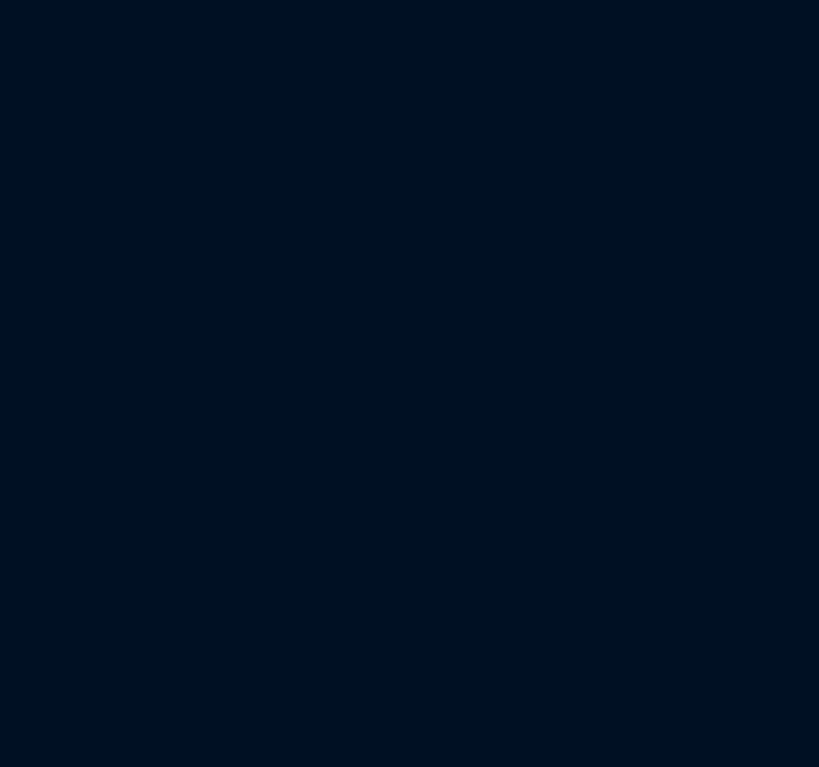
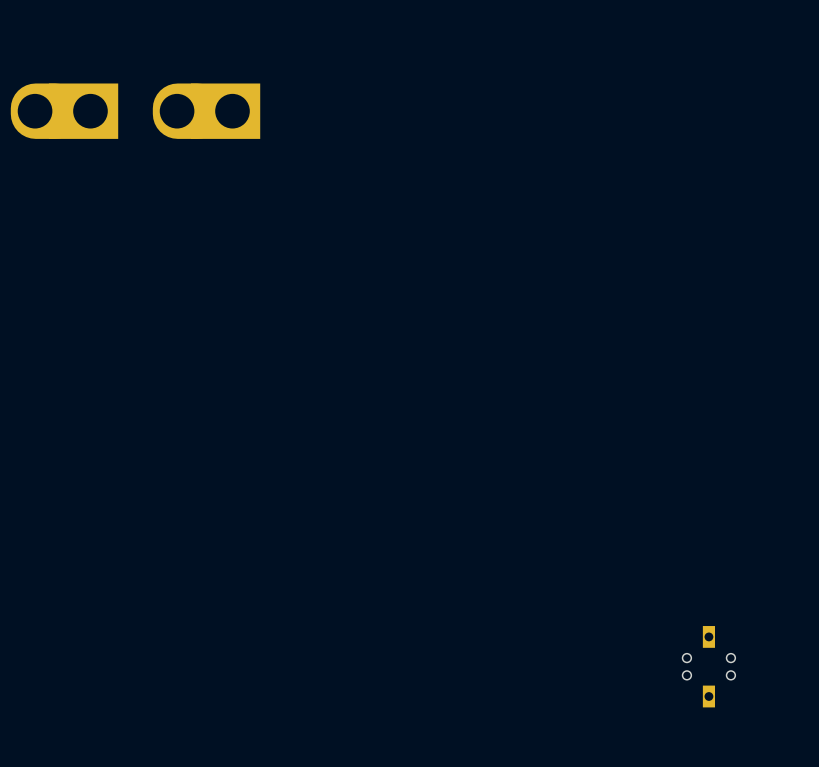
part: none -> (64, 111)
part: none -> (206, 111)
part: none -> (708, 666)

